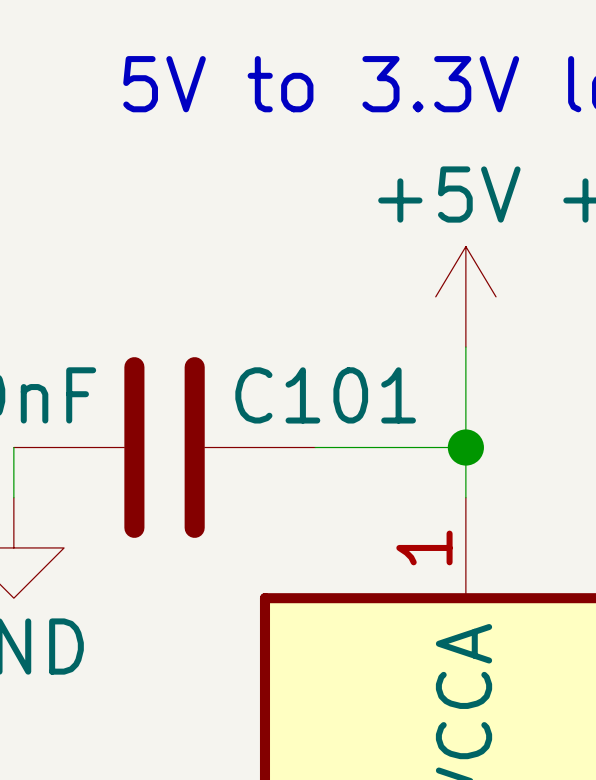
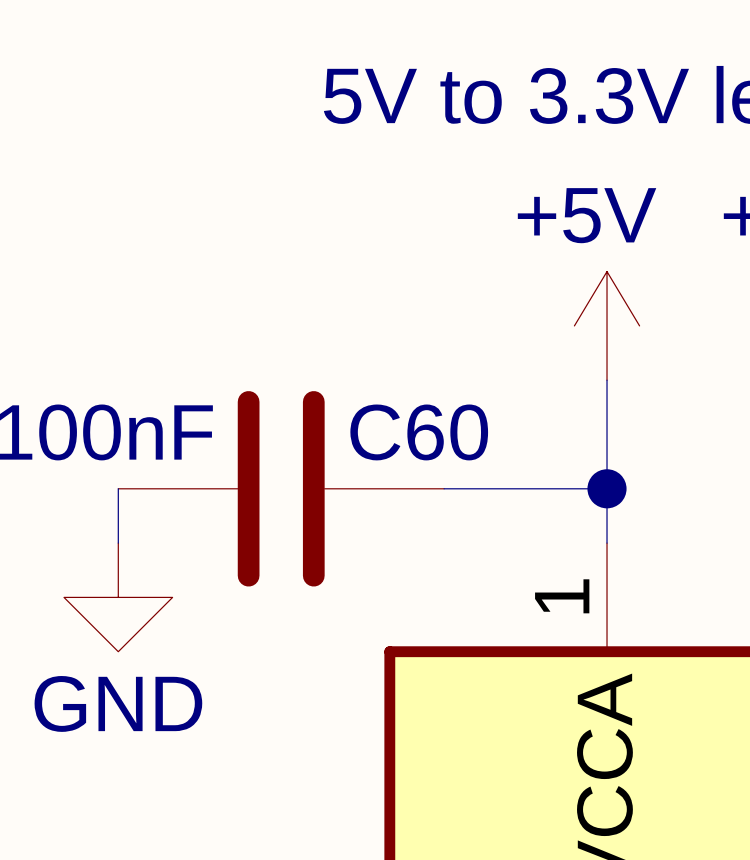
C101 name: C101 (325, 395) -> C60 (419, 432)

